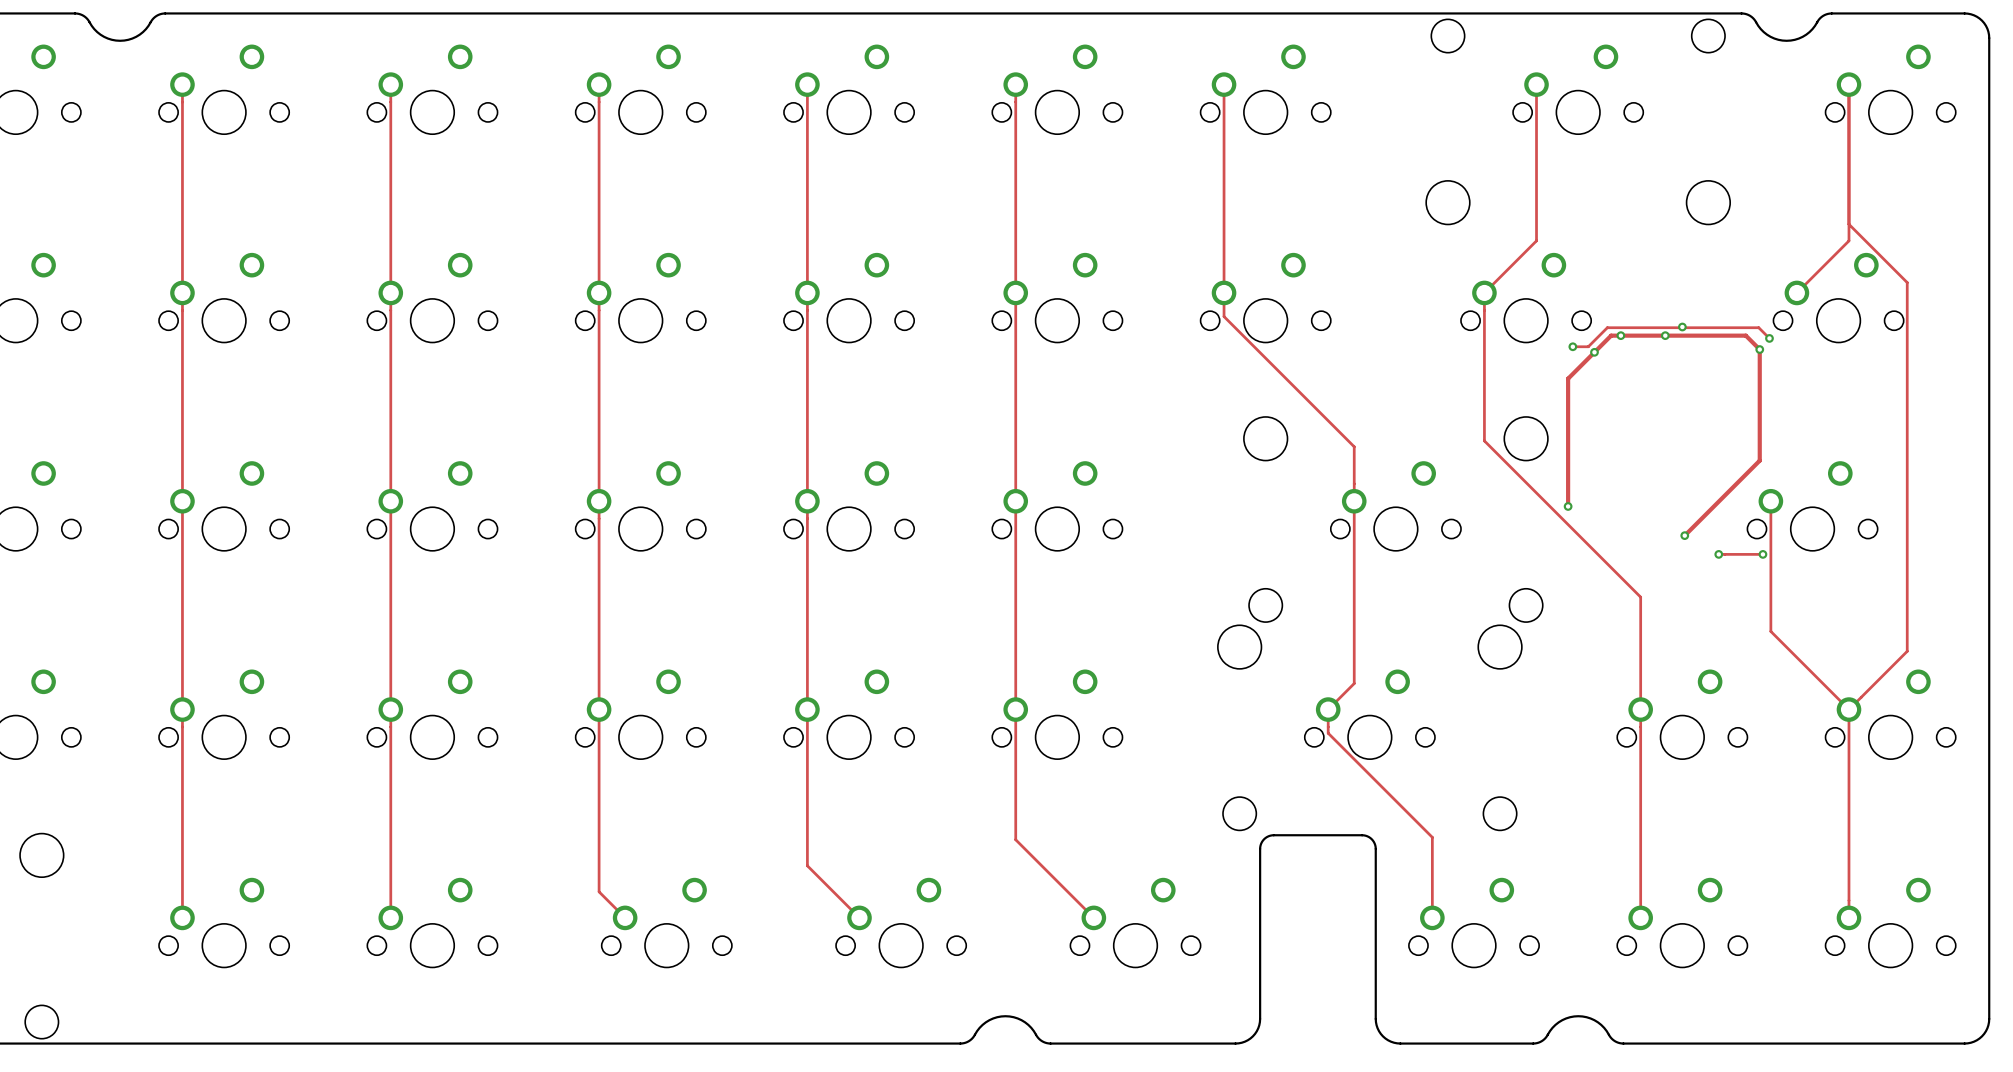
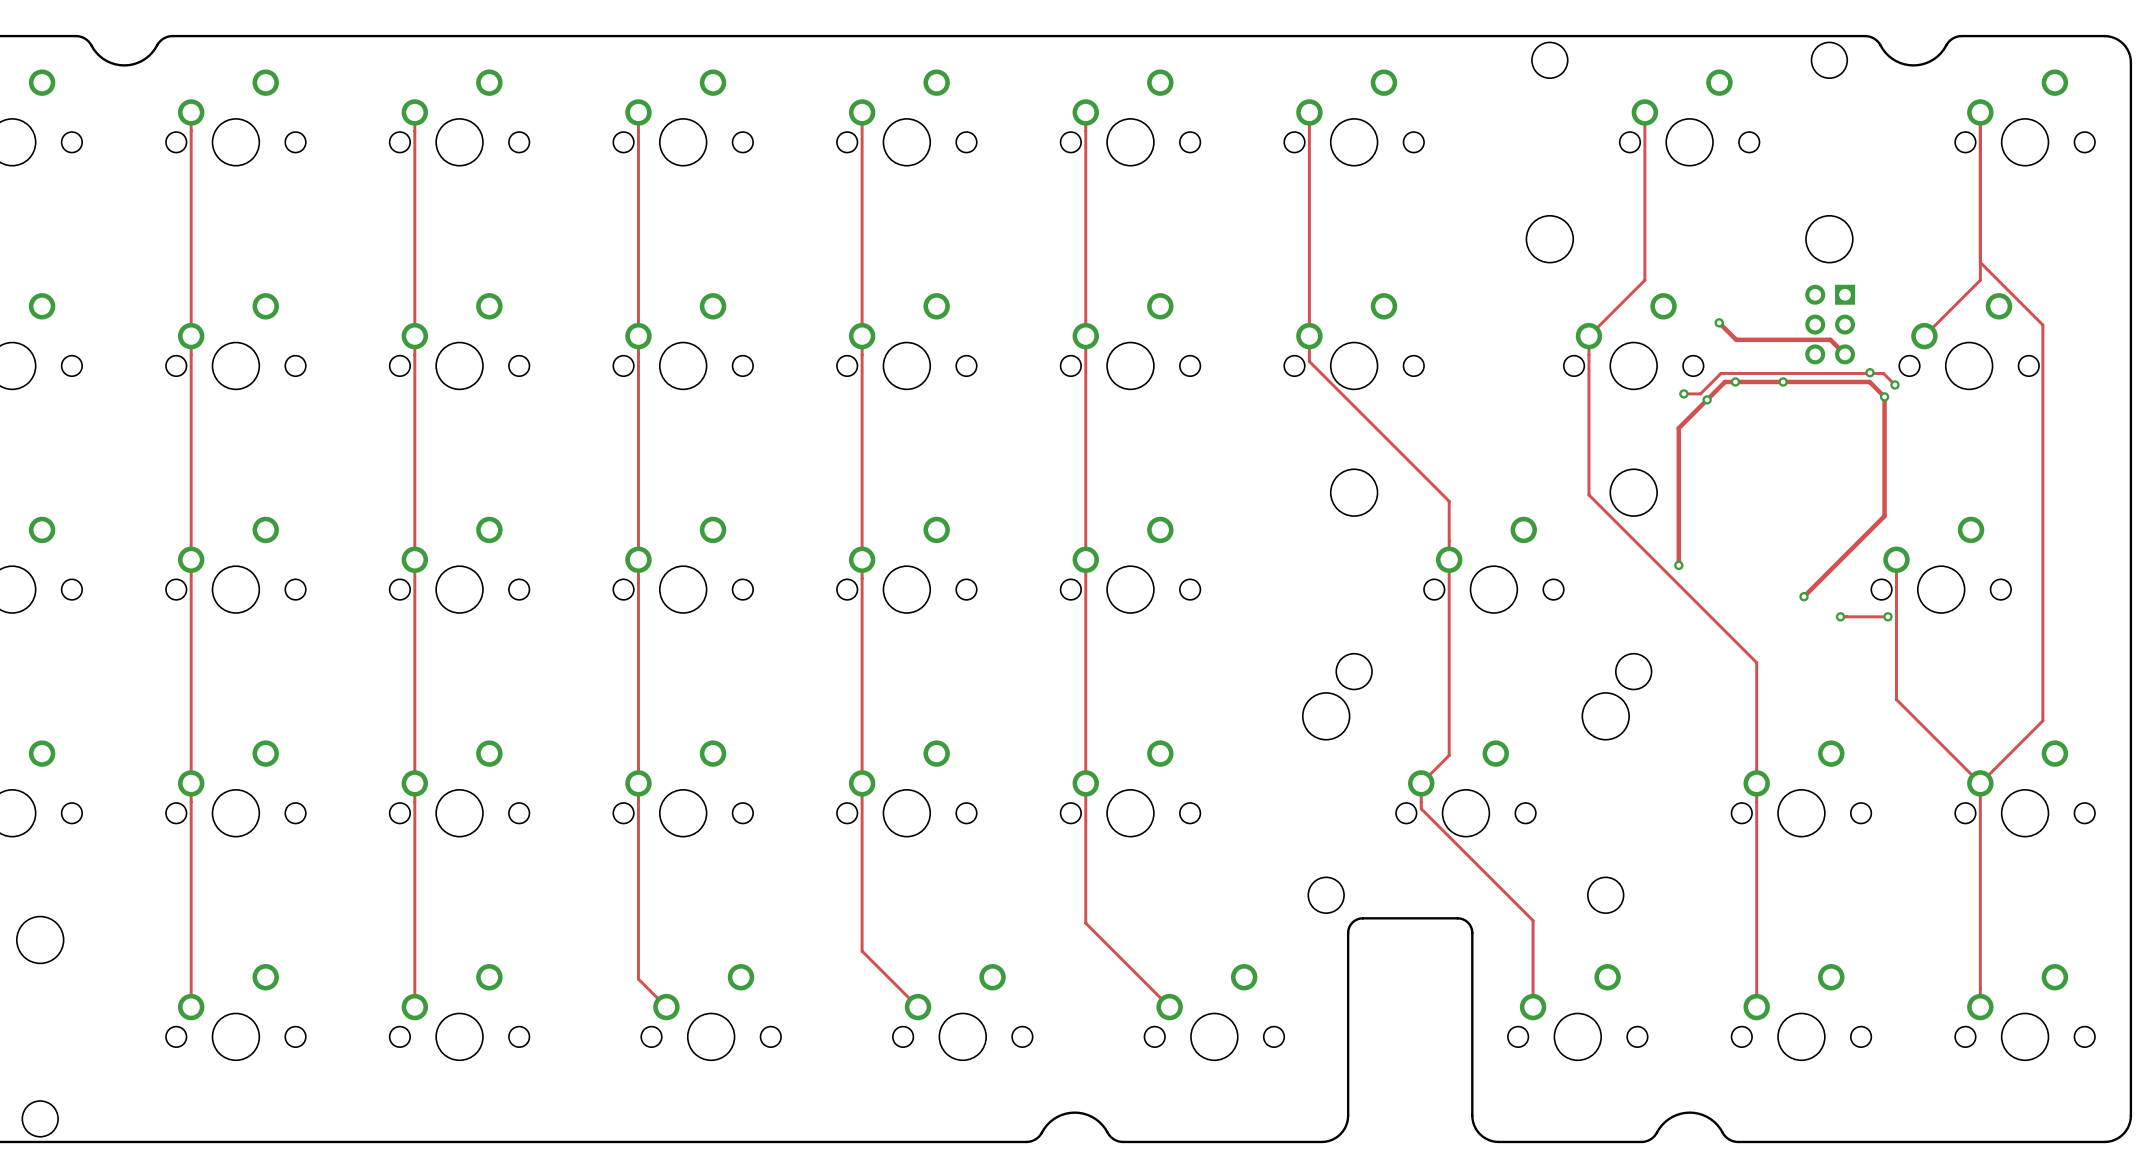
track: none -> (1719, 322) (1736, 339) (1830, 339) (1845, 354)
via: none -> (1719, 322)
part: none -> (1830, 324)
via: (1682, 327) -> none
via: none -> (1869, 372)

